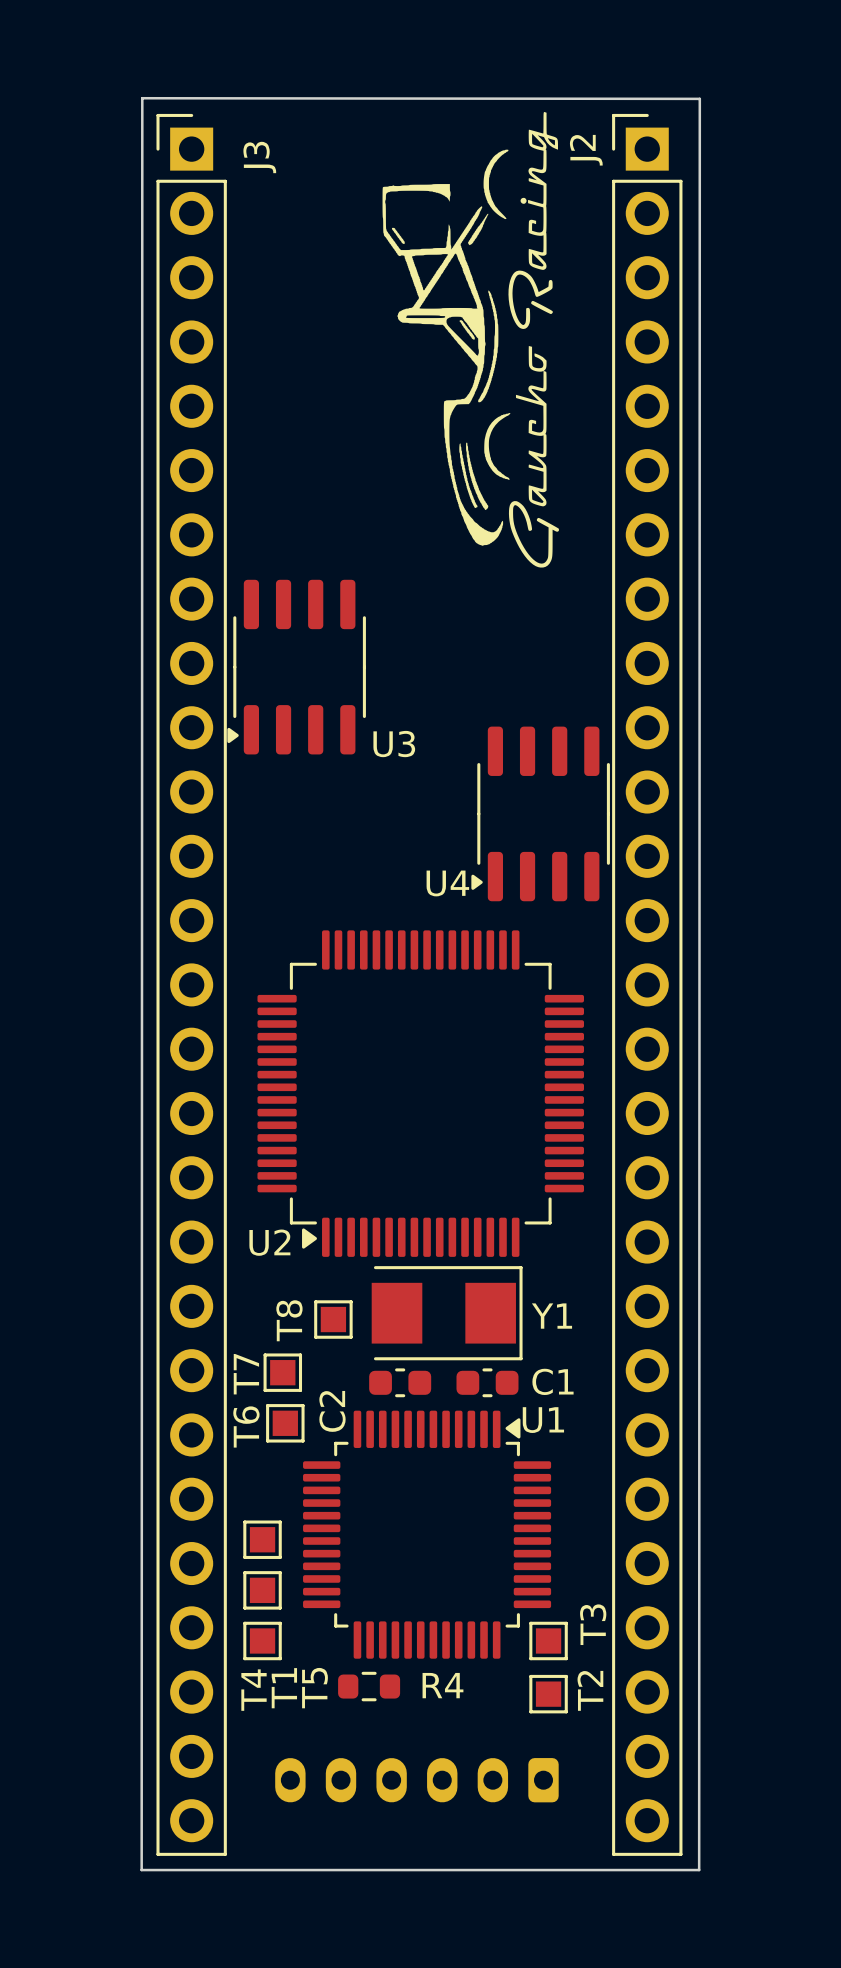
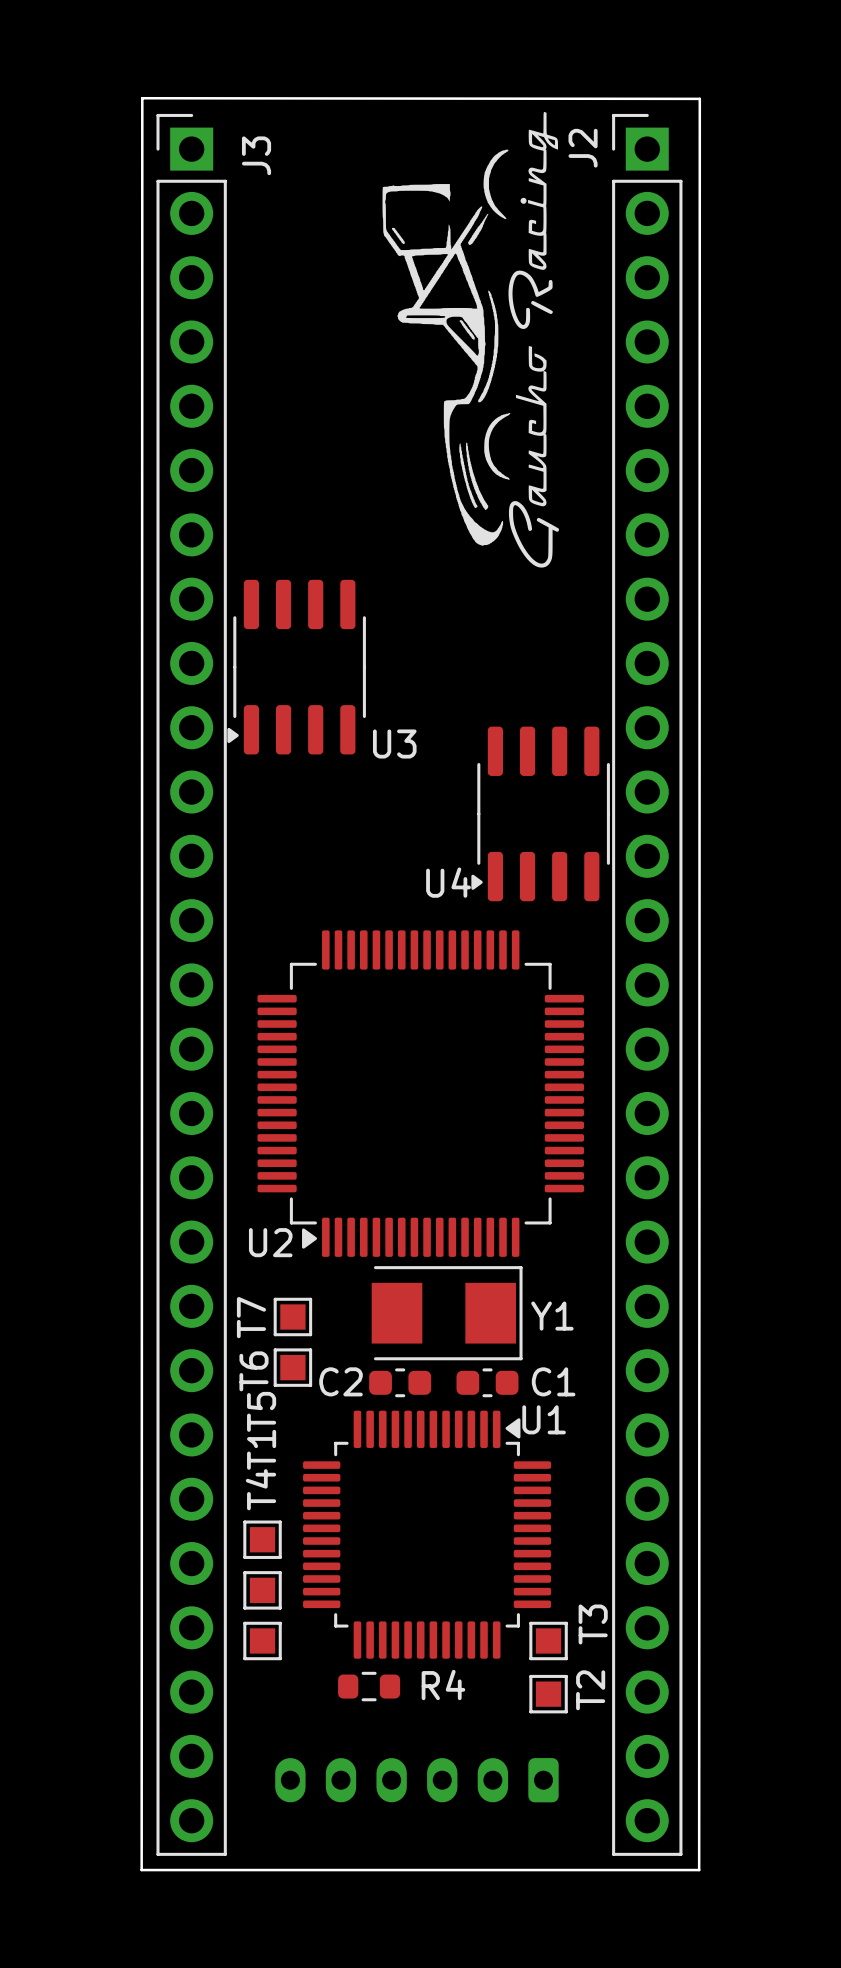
T8: (333, 1319) -> none
T7 position: (282, 1372) -> (292, 1317)
T7 name position: T7 (246, 1374) -> T7 (251, 1317)
C2 name rotation: 0° (332, 1411) -> 90° clockwise (341, 1381)
T6 position: (285, 1423) -> (292, 1367)
T1 name position: T1 (284, 1688) -> T1 (261, 1449)
T5 name position: T5 (314, 1688) -> T5 (261, 1411)
T4 name position: T4 (254, 1690) -> T4 (260, 1489)

